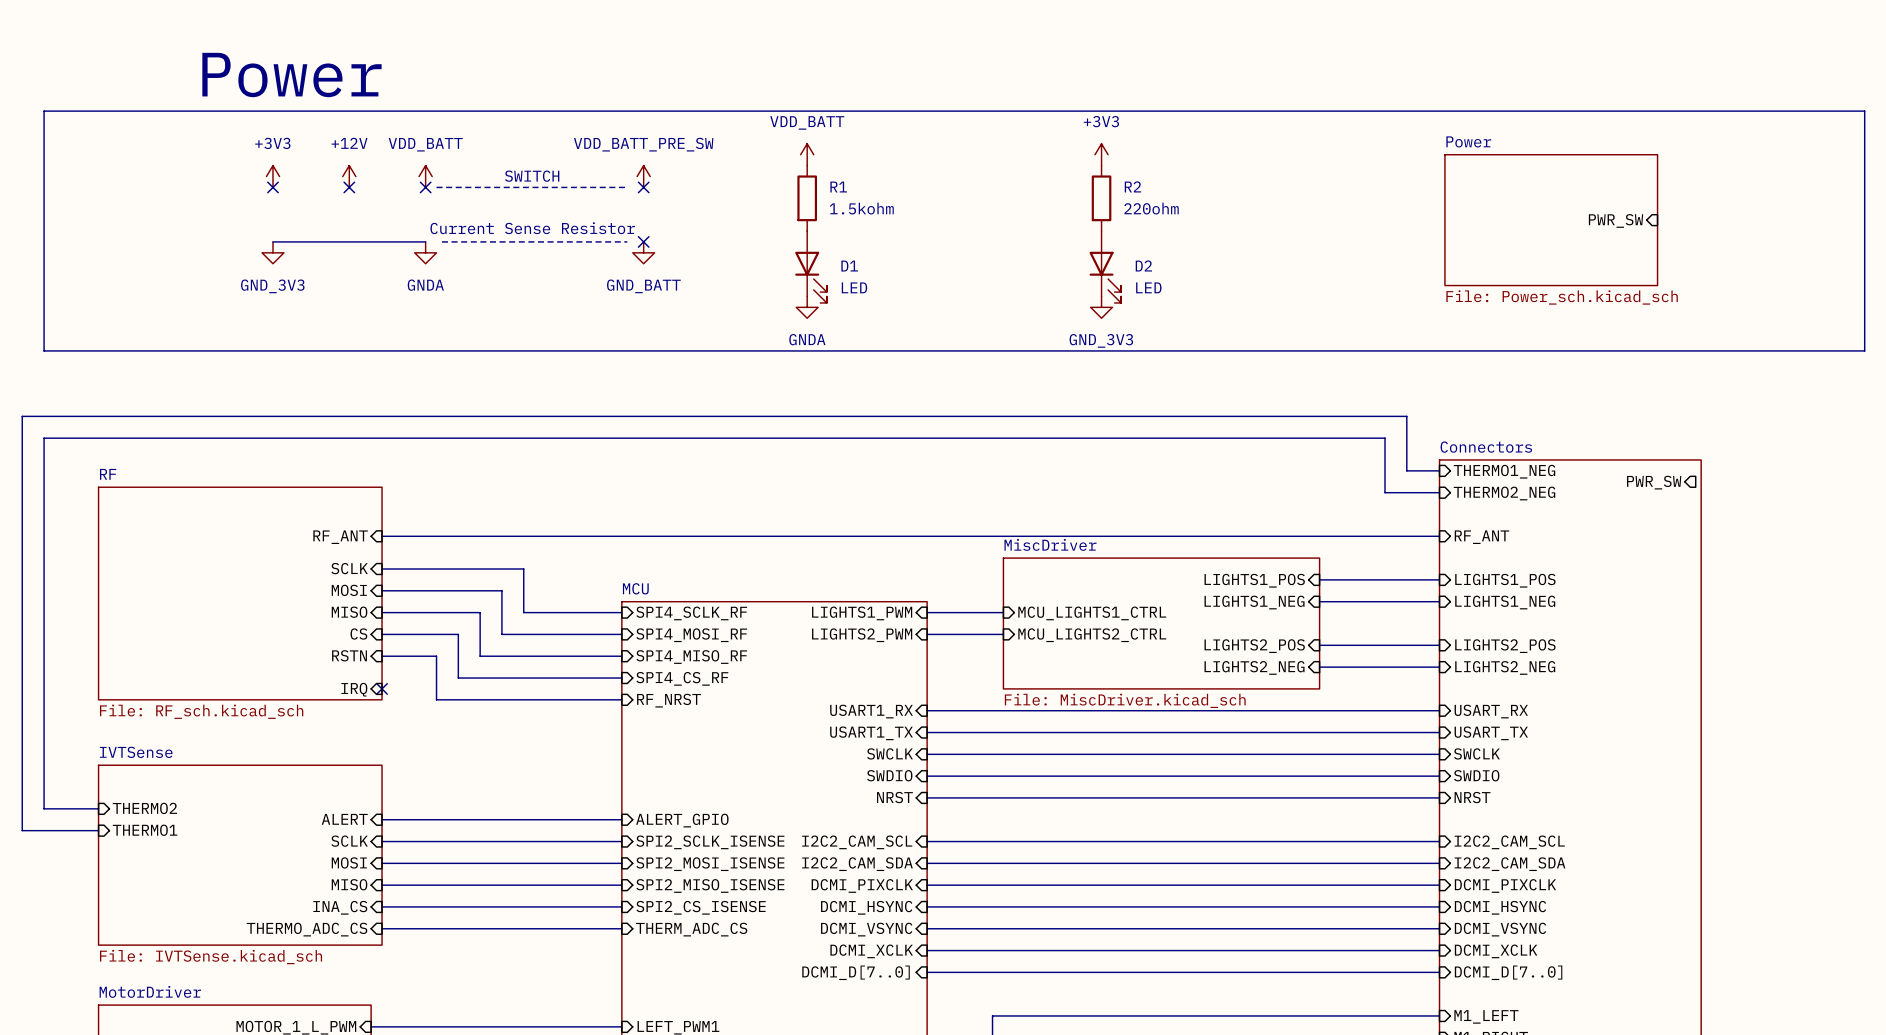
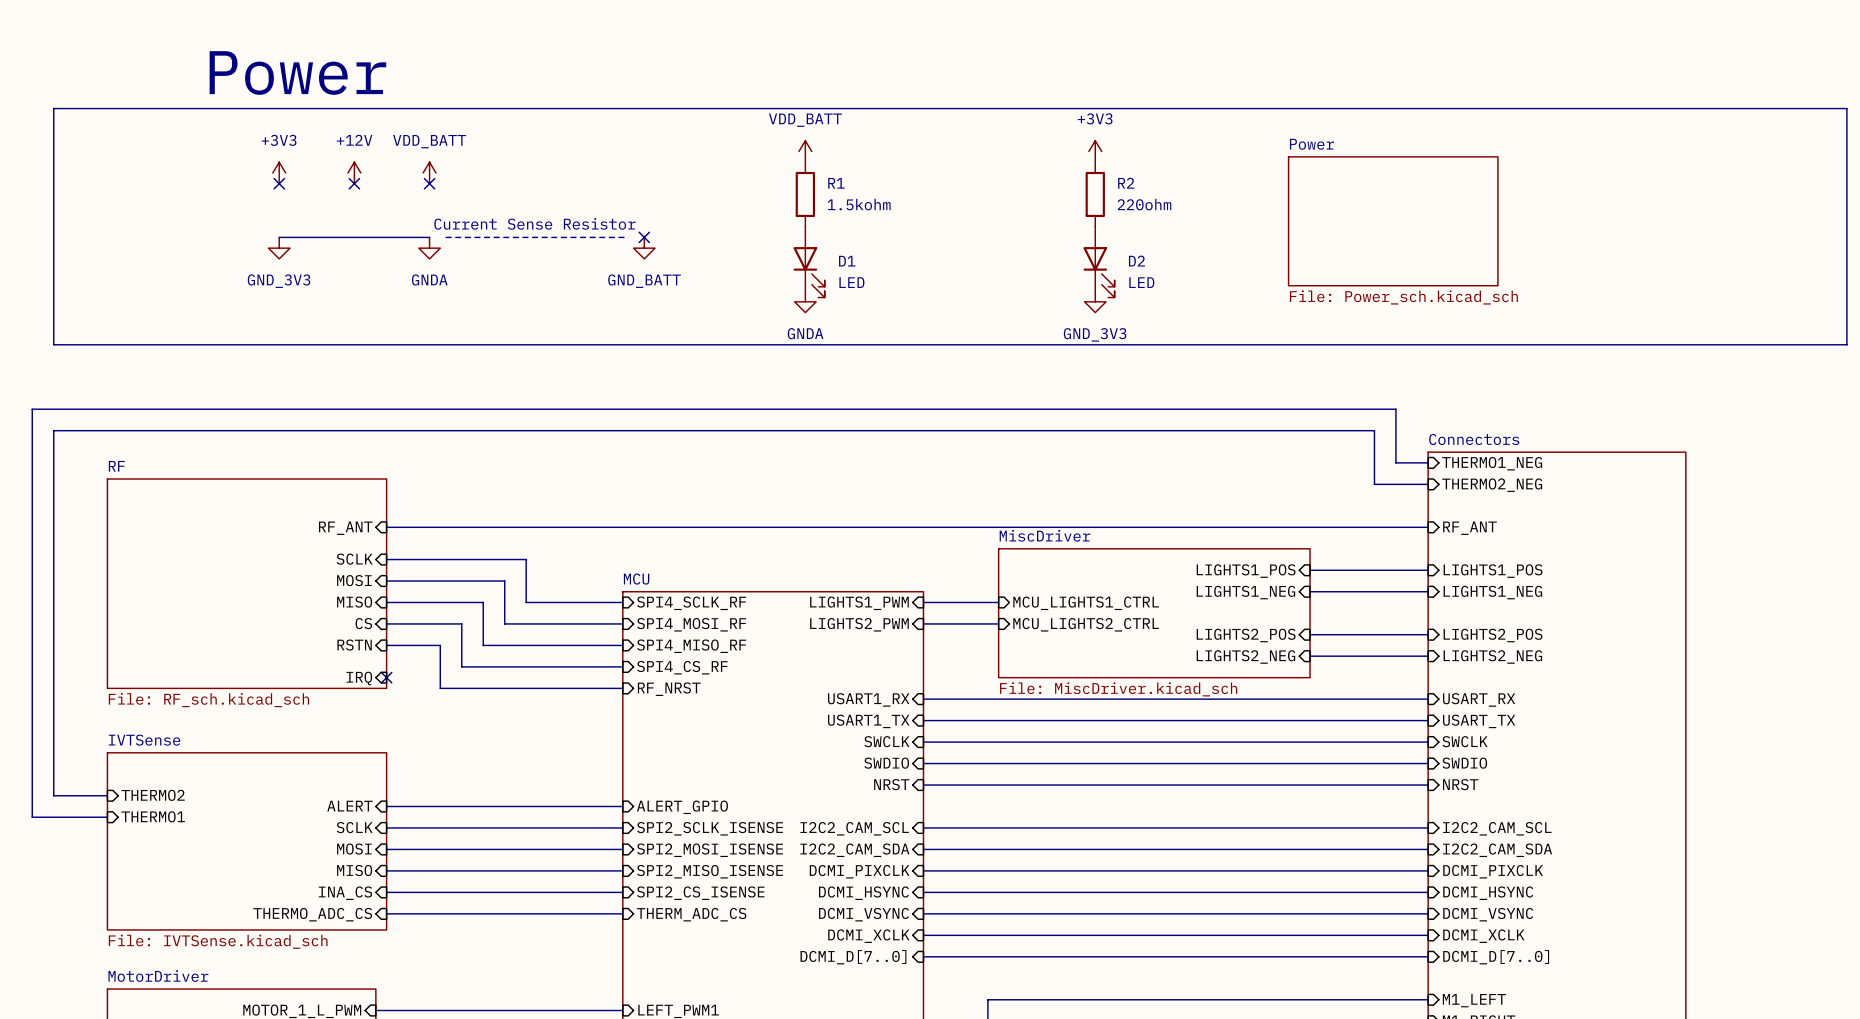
text: SWITCH (532, 176) -> none
power symbol: VDD_BATT_PRE_SW (643, 176) -> none
line: (436, 187) (627, 187) -> none
no-connect mark: (643, 187) -> none
sheet Power position: (1551, 220) -> (1393, 221)
sheet pin: PWR_SW (1616, 220) -> none
sheet pin: PWR_SW (1654, 482) -> none

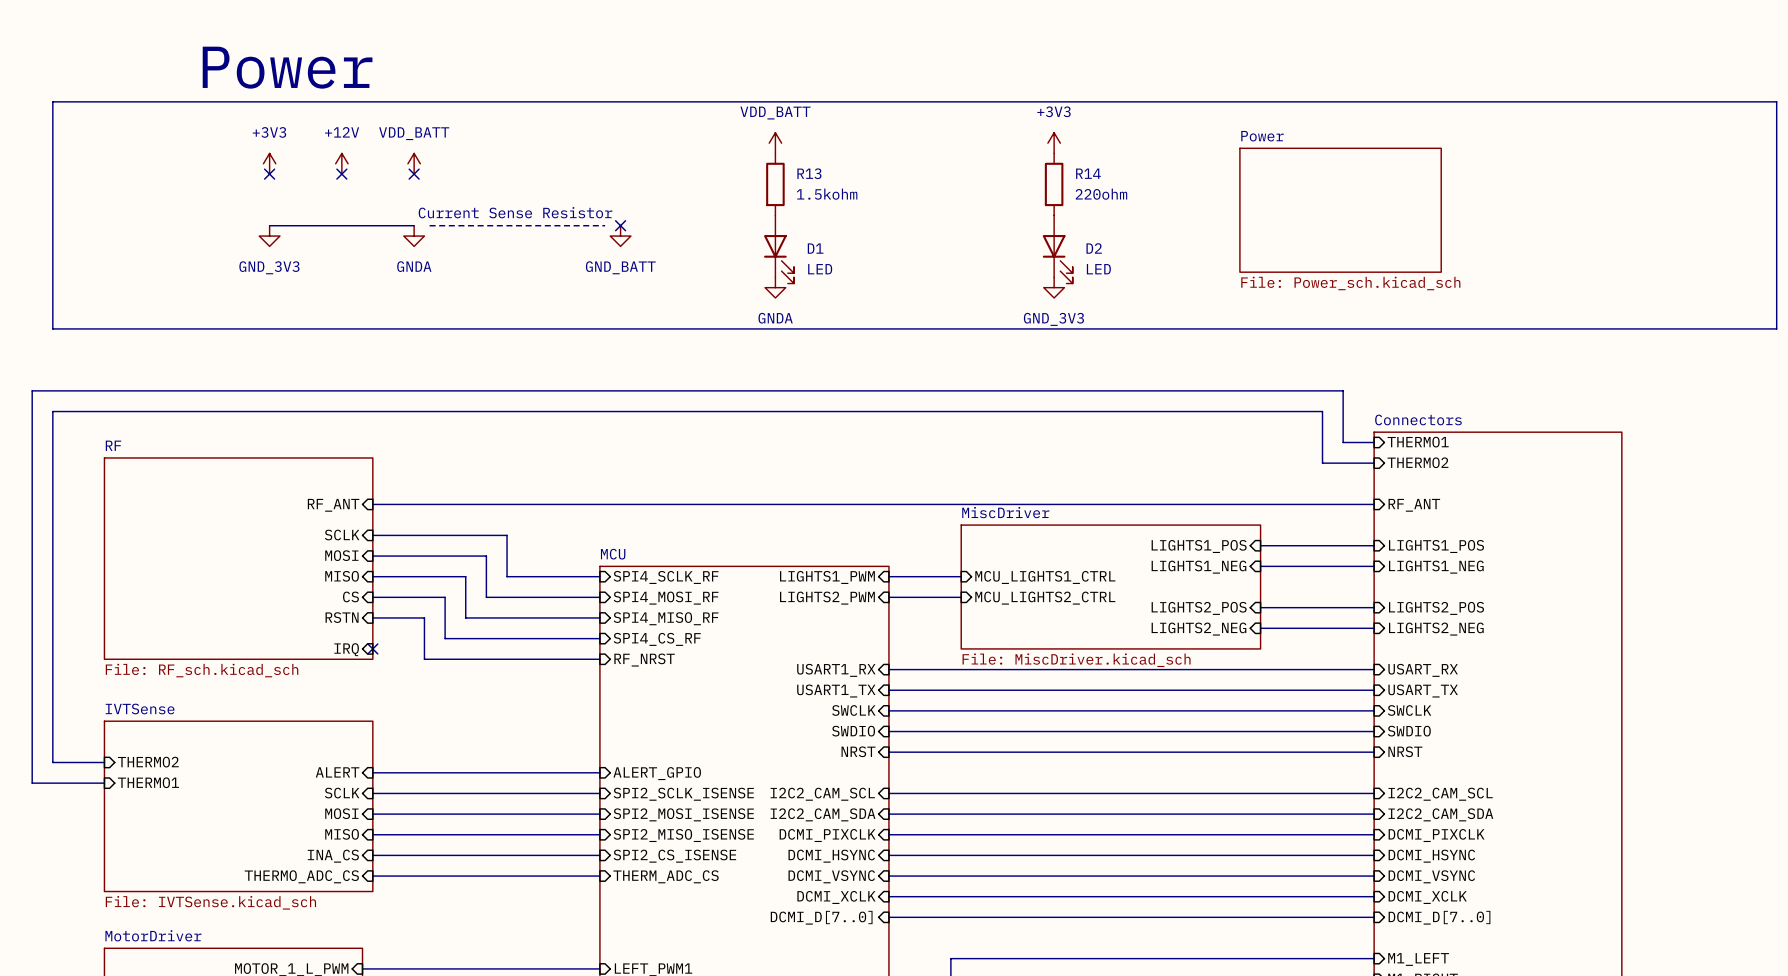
R1 name: R1 (836, 183) -> R13 (809, 173)
R2 name: R2 (1126, 183) -> R14 (1088, 173)
sheet pin: THERMO1_NEG (1492, 463) -> THERMO1 (1418, 442)
sheet pin: THERMO2_NEG (1492, 485) -> THERMO2 (1418, 462)

